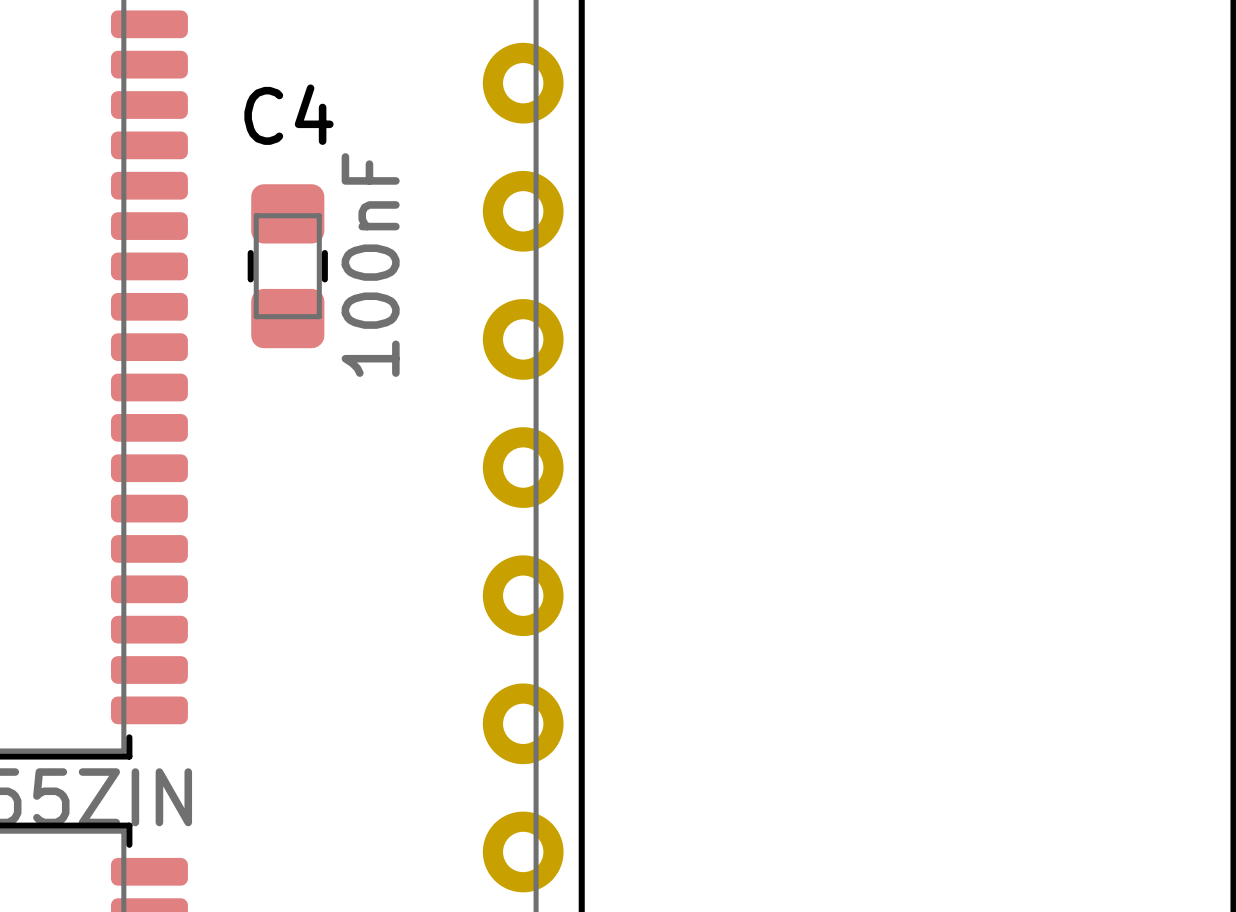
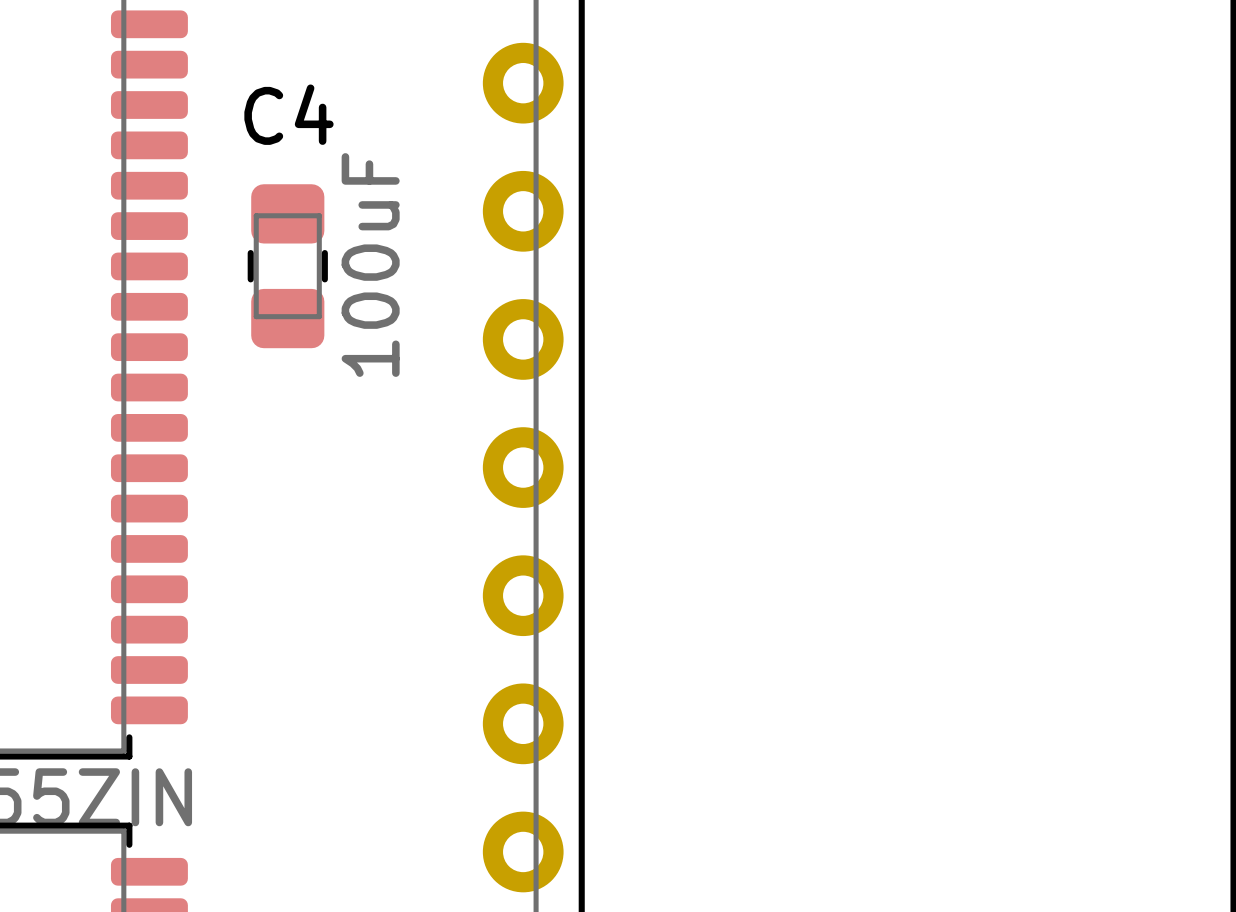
C4 value: 100nF (370, 265) -> 100uF (370, 265)

